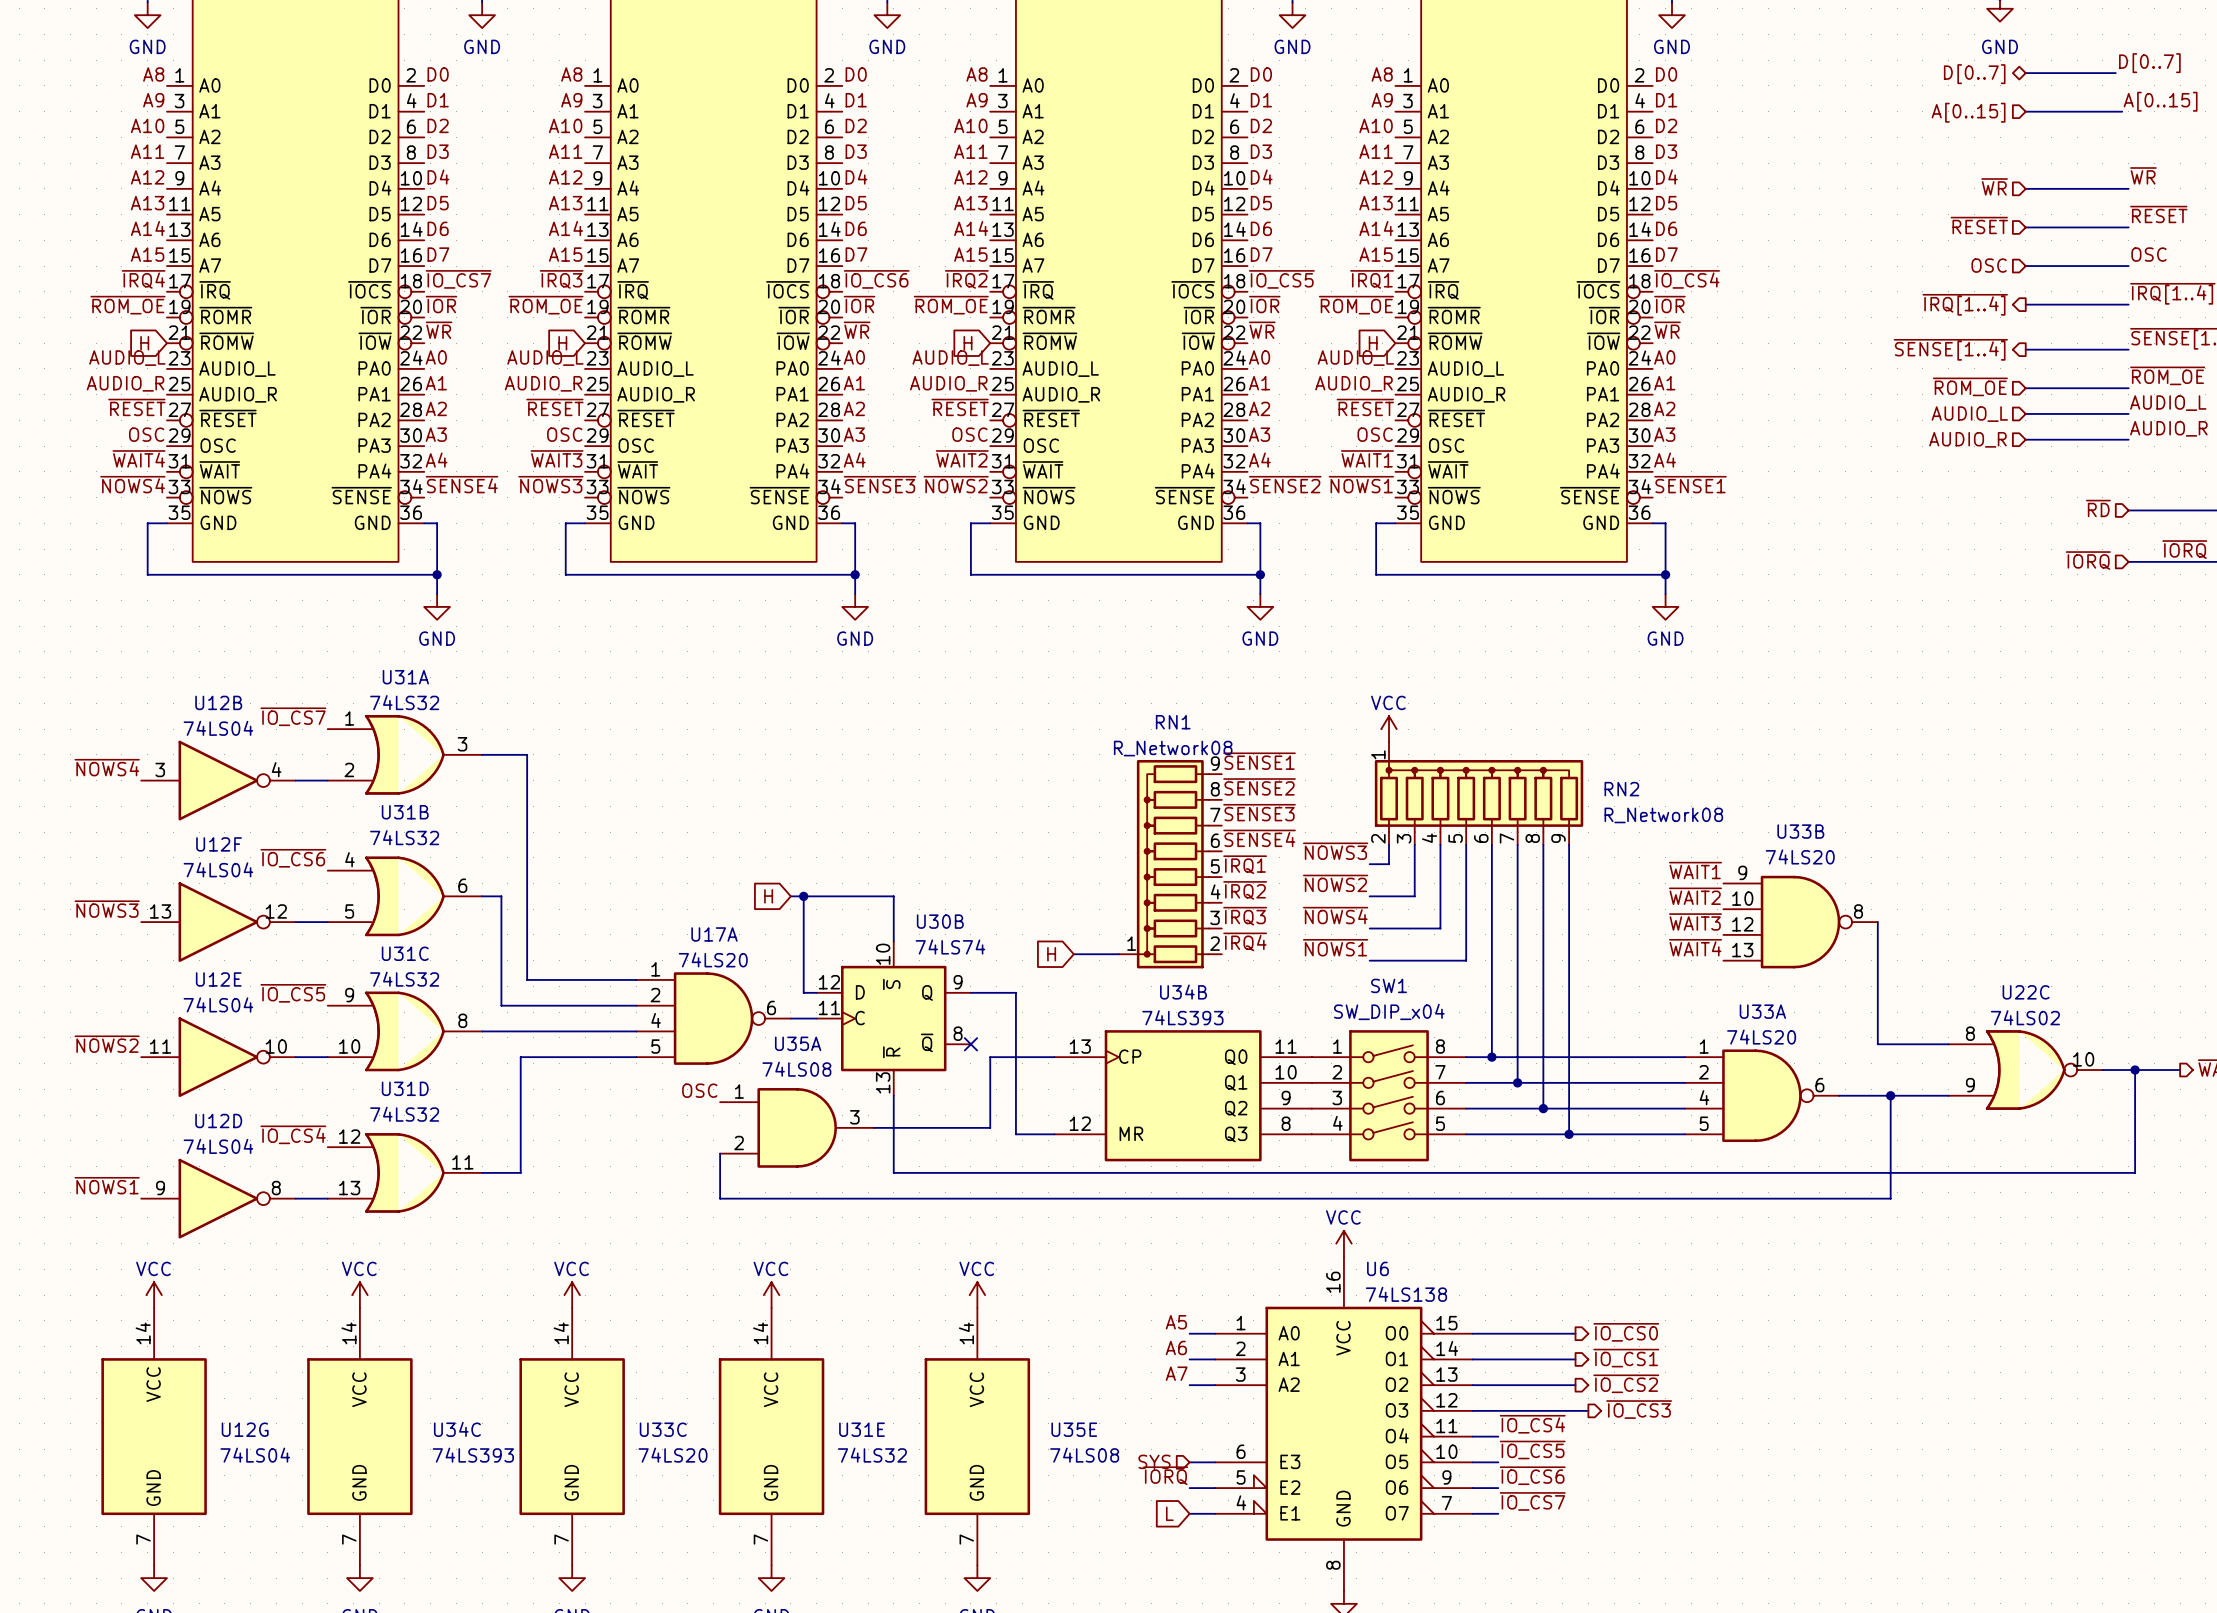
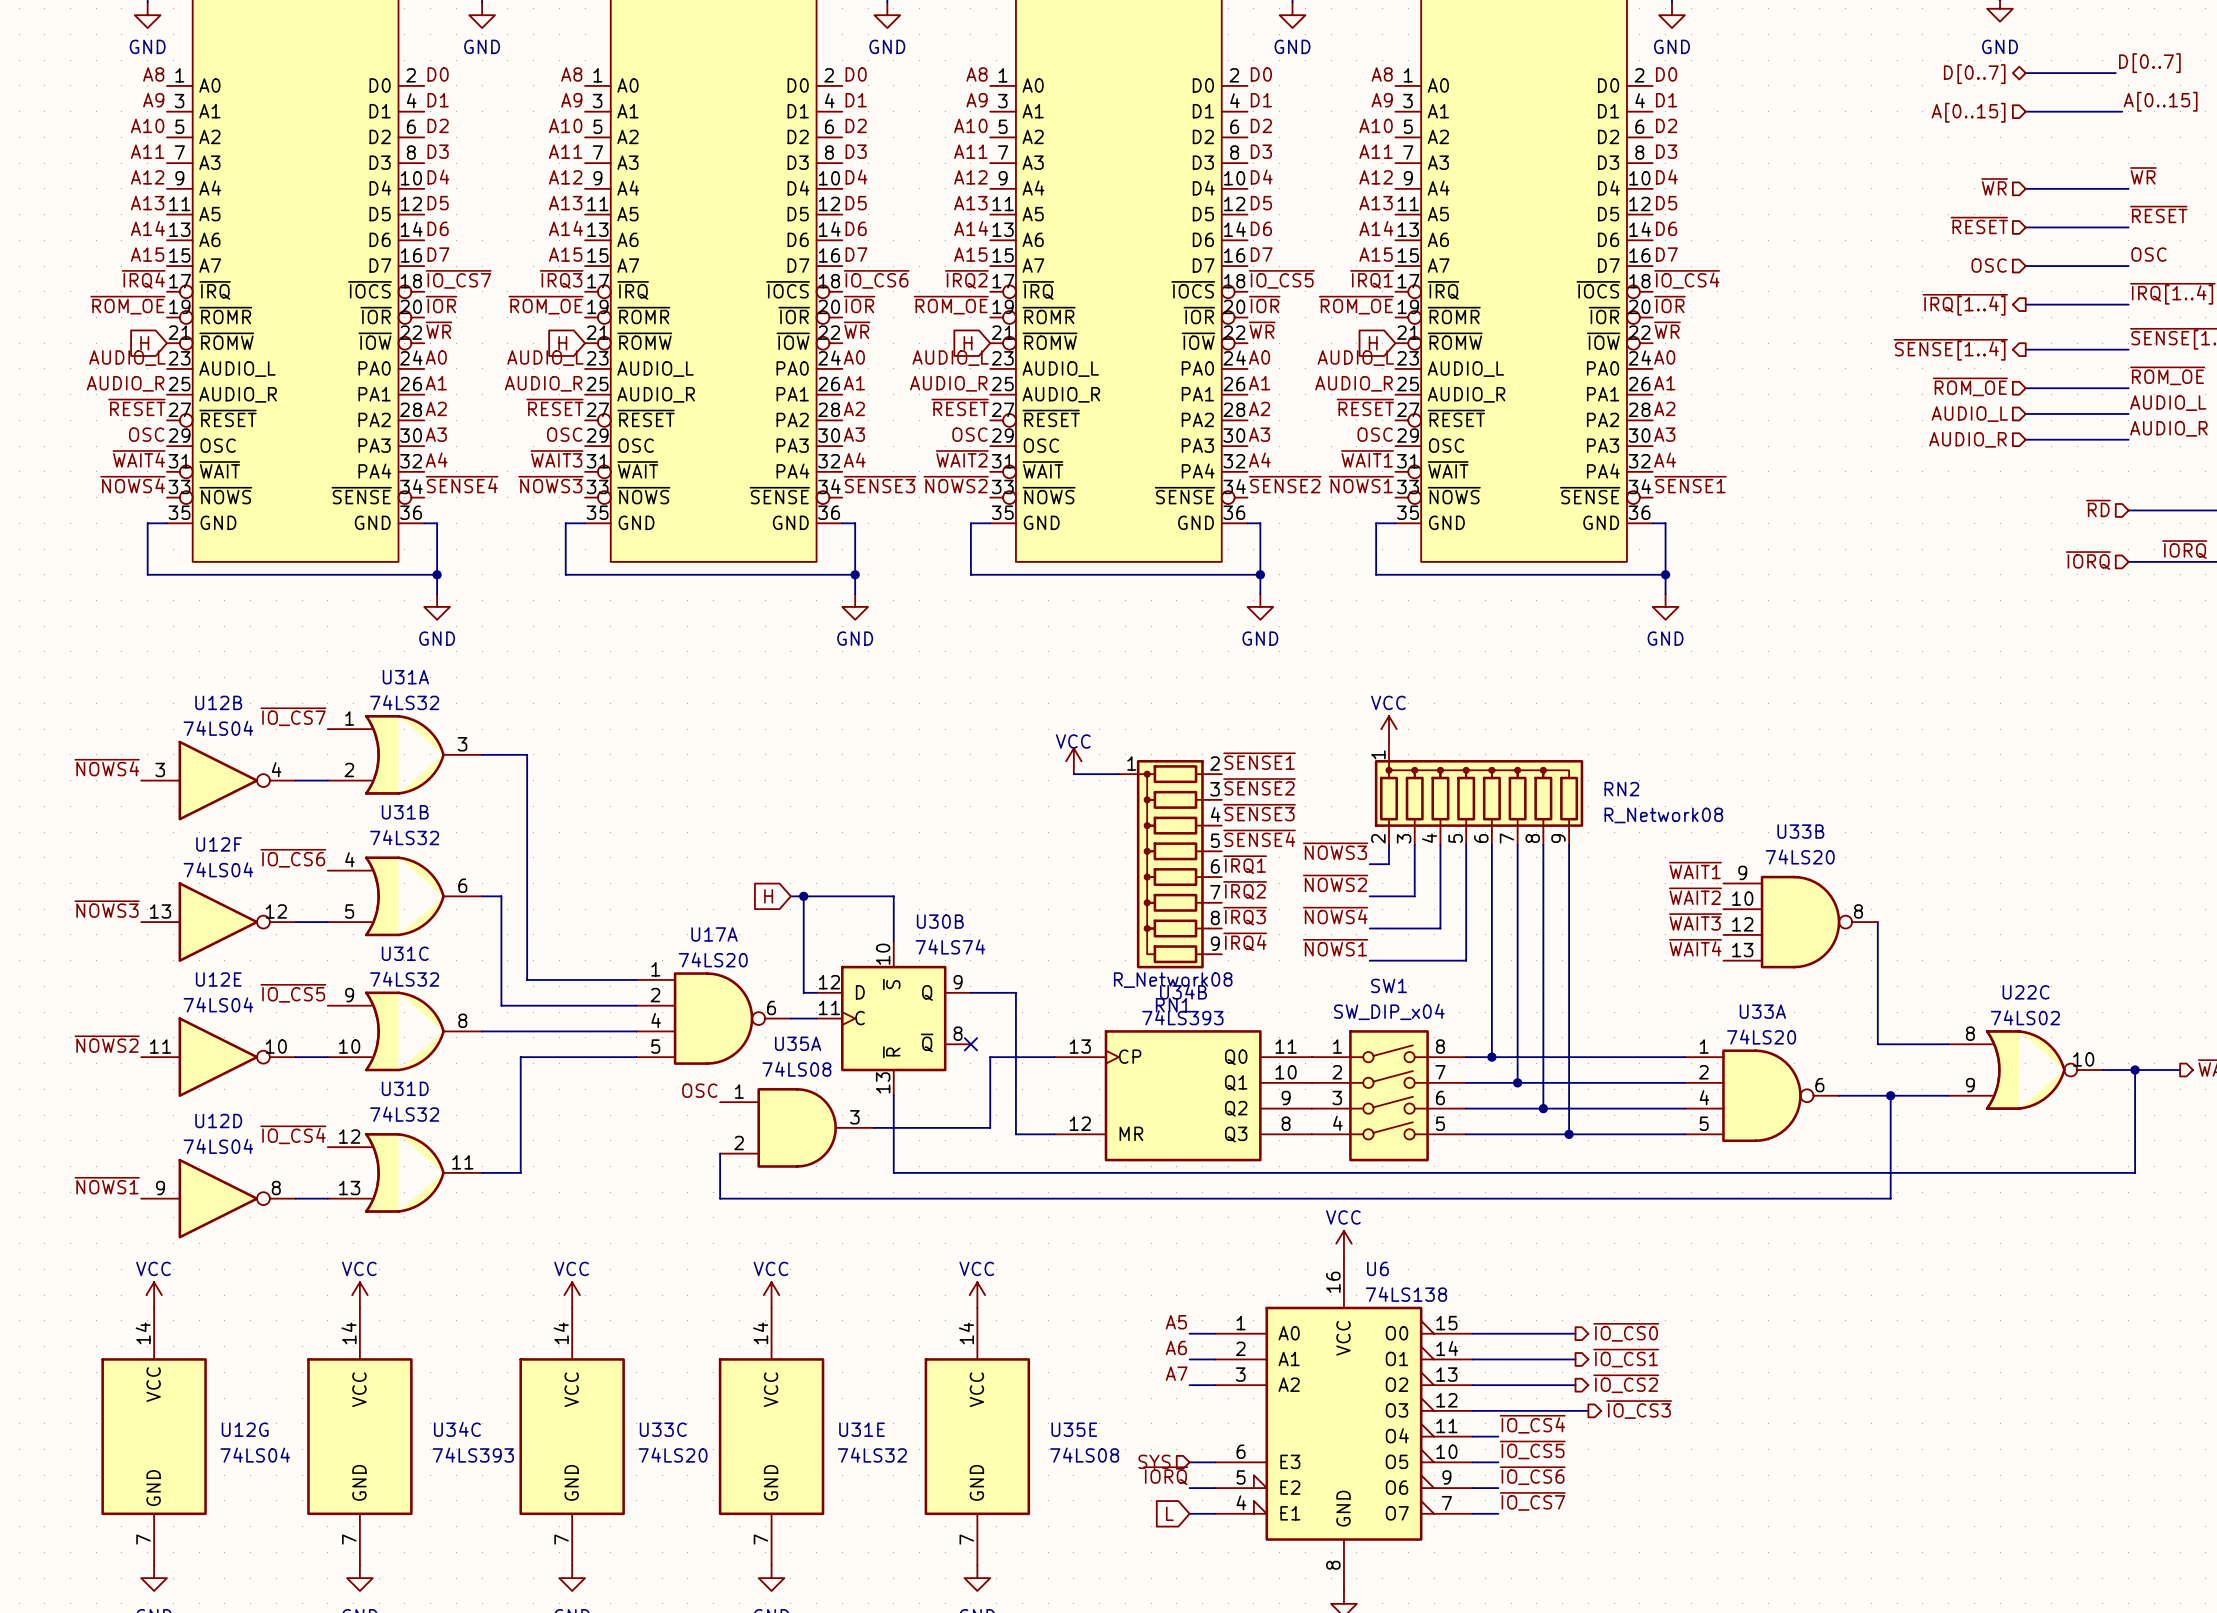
power symbol: none -> VCC (1073, 761)
RN1 flip: as is (1172, 864) -> up-down (1172, 864)
global label: H (1051, 954) -> none
wire: (1073, 954) (1118, 954) -> (1073, 774) (1118, 774)

